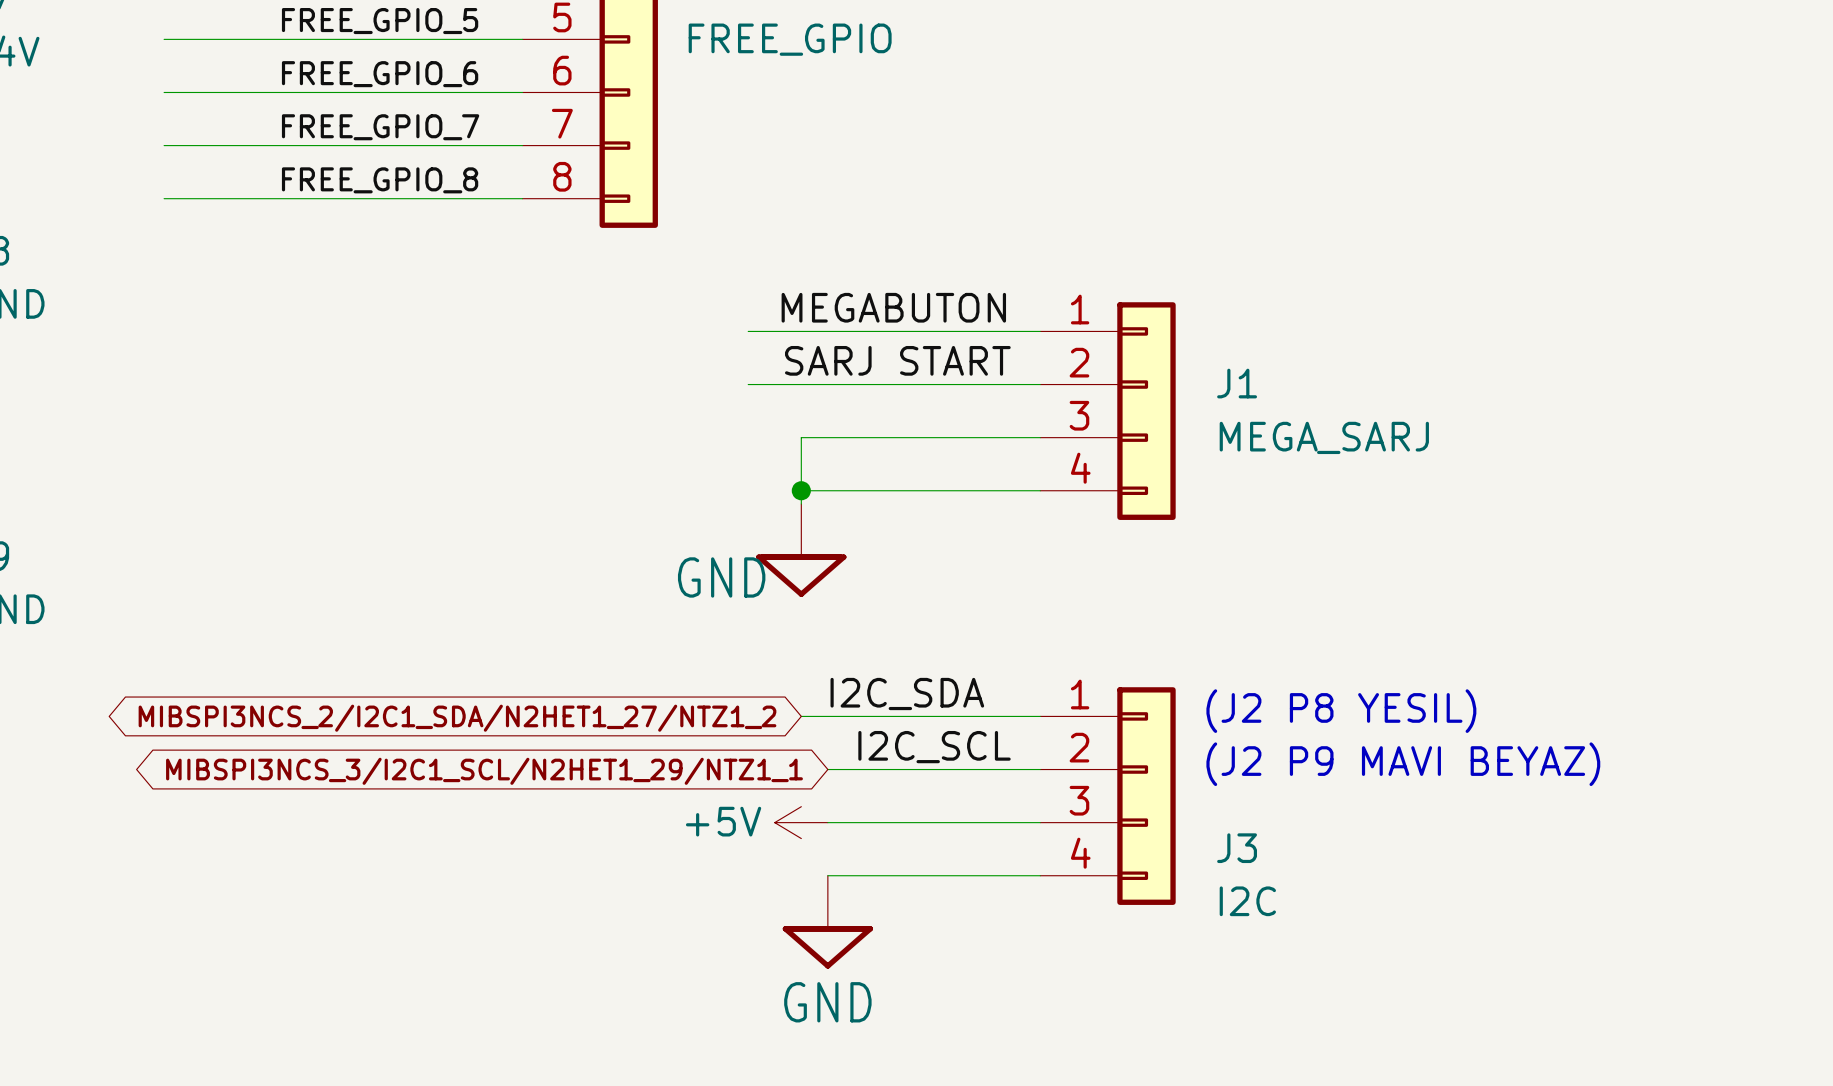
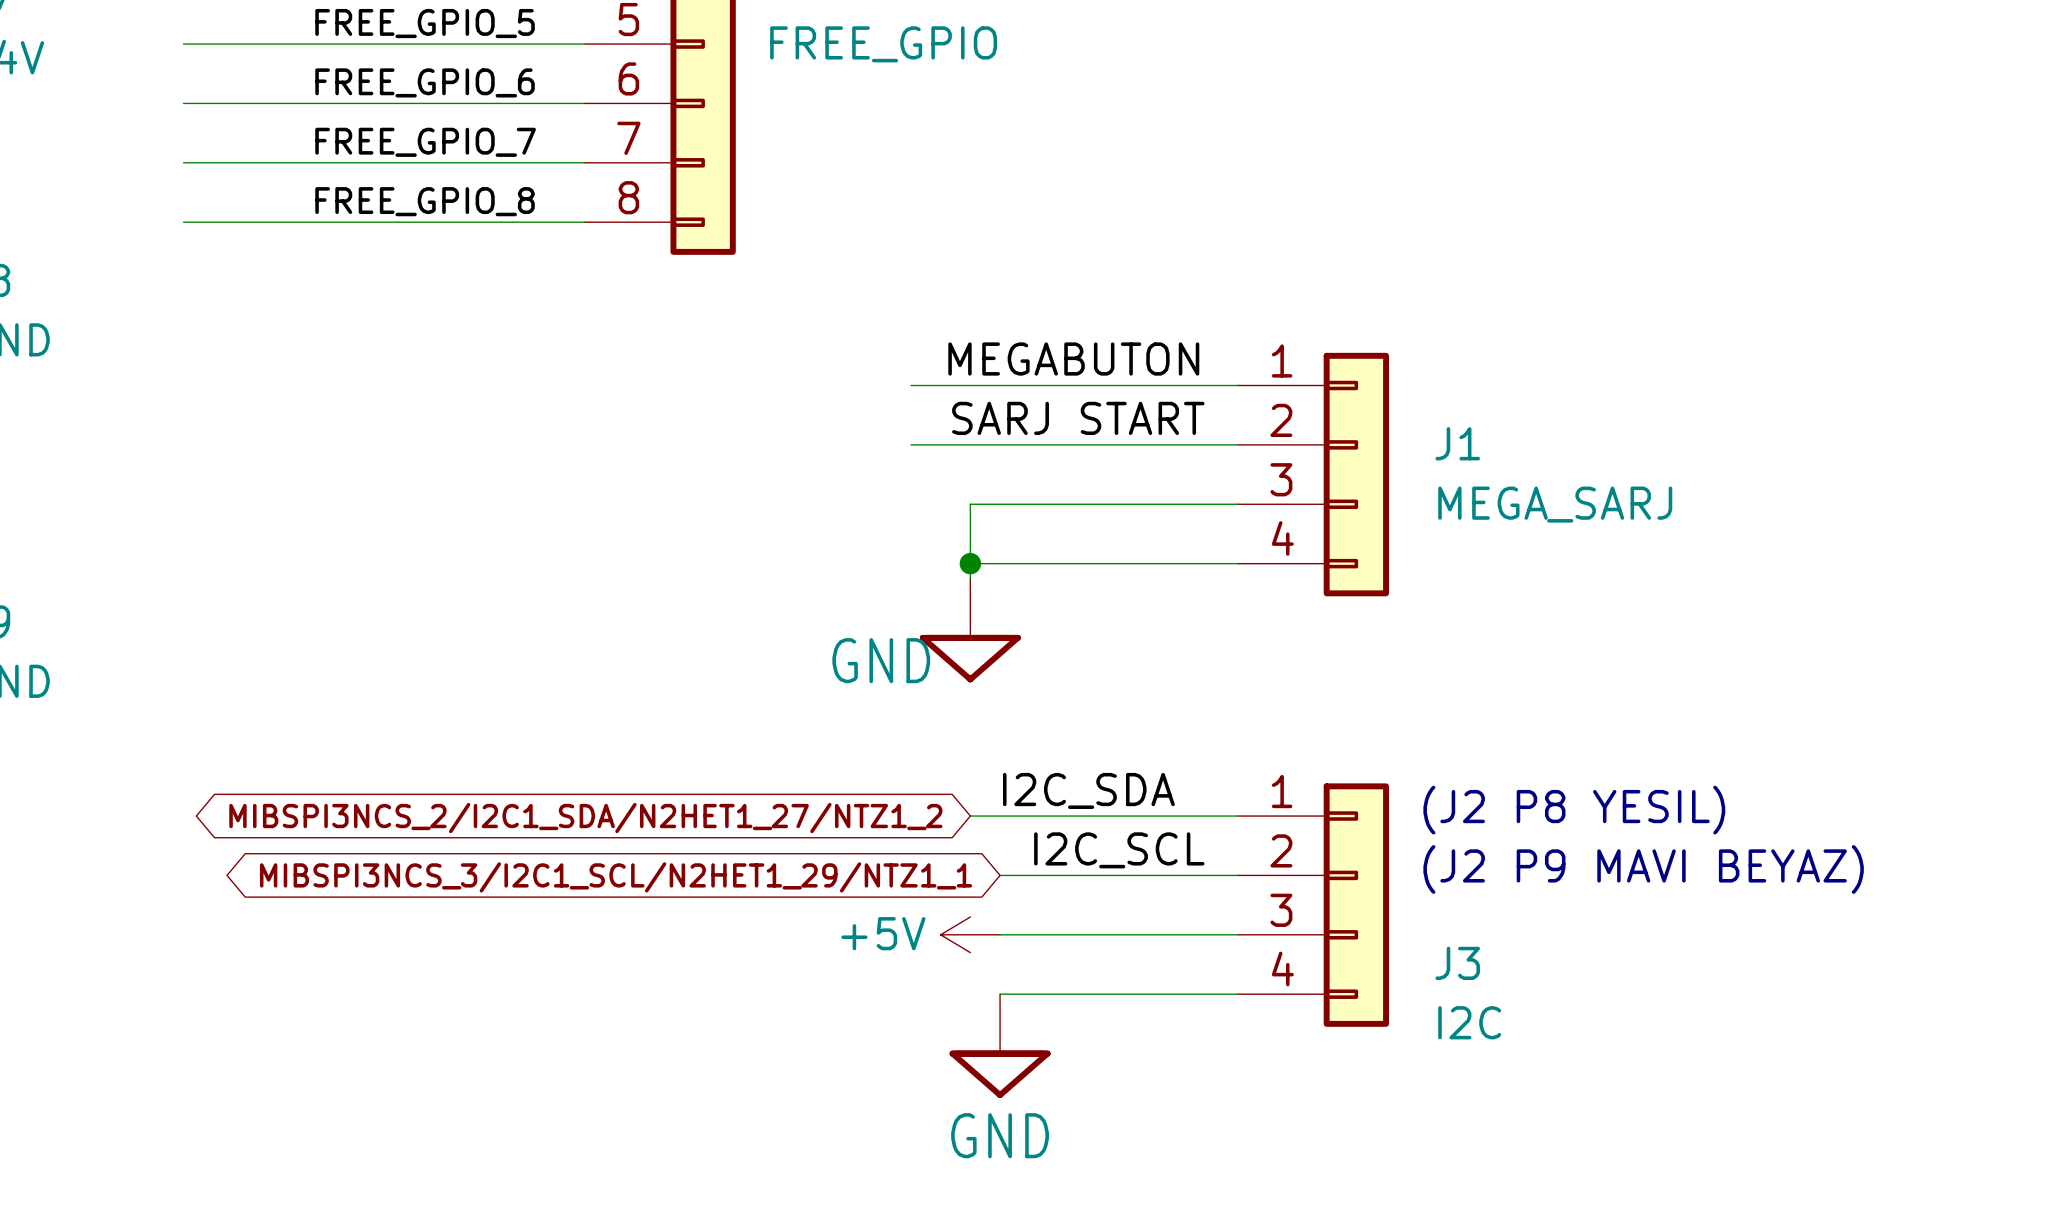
label position: MEGABUTON (893, 307) -> MEGABUTON (1073, 359)
wire: (748, 331) (1040, 331) -> (910, 385) (1237, 385)
label position: SARJ START (897, 360) -> SARJ START (1078, 418)
wire: (748, 384) (1040, 384) -> (910, 444) (1237, 444)
J1 position: (1107, 411) -> (1313, 474)
wire: (1040, 437) (801, 437) (801, 504) -> (1237, 504) (970, 504) (970, 578)
wire: (801, 490) (1040, 490) -> (970, 563) (1237, 563)
junction position: (801, 490) -> (970, 563)
power symbol position: GND (801, 550) -> GND (970, 630)
label position: I2C_SDA (907, 693) -> I2C_SDA (1088, 790)
text position: (J2 P8 YESIL) (1341, 711) -> (J2 P8 YESIL) (1574, 810)
wire: (801, 716) (1040, 716) -> (970, 816) (1237, 816)
global label position: MIBSPI3NCS_2/I2C1_SDA/N2HET1_27/NTZ1_2 (457, 718) -> MIBSPI3NCS_2/I2C1_SDA/N2HET1_27/NTZ1_2 (585, 818)
label position: I2C_SCL (934, 747) -> I2C_SCL (1119, 850)
text position: (J2 P9 MAVI BEYAZ) (1403, 764) -> (J2 P9 MAVI BEYAZ) (1643, 869)
wire: (827, 769) (1040, 769) -> (1000, 875) (1237, 875)
global label position: MIBSPI3NCS_3/I2C1_SCL/N2HET1_29/NTZ1_1 (484, 771) -> MIBSPI3NCS_3/I2C1_SCL/N2HET1_29/NTZ1_1 (616, 877)
J3 position: (1107, 796) -> (1313, 905)
power symbol position: +5V (801, 822) -> +5V (970, 934)
wire: (827, 822) (1040, 822) -> (1000, 934) (1237, 934)
wire: (827, 875) (1040, 875) -> (1000, 994) (1237, 994)
power symbol position: GND (827, 922) -> GND (1000, 1046)

